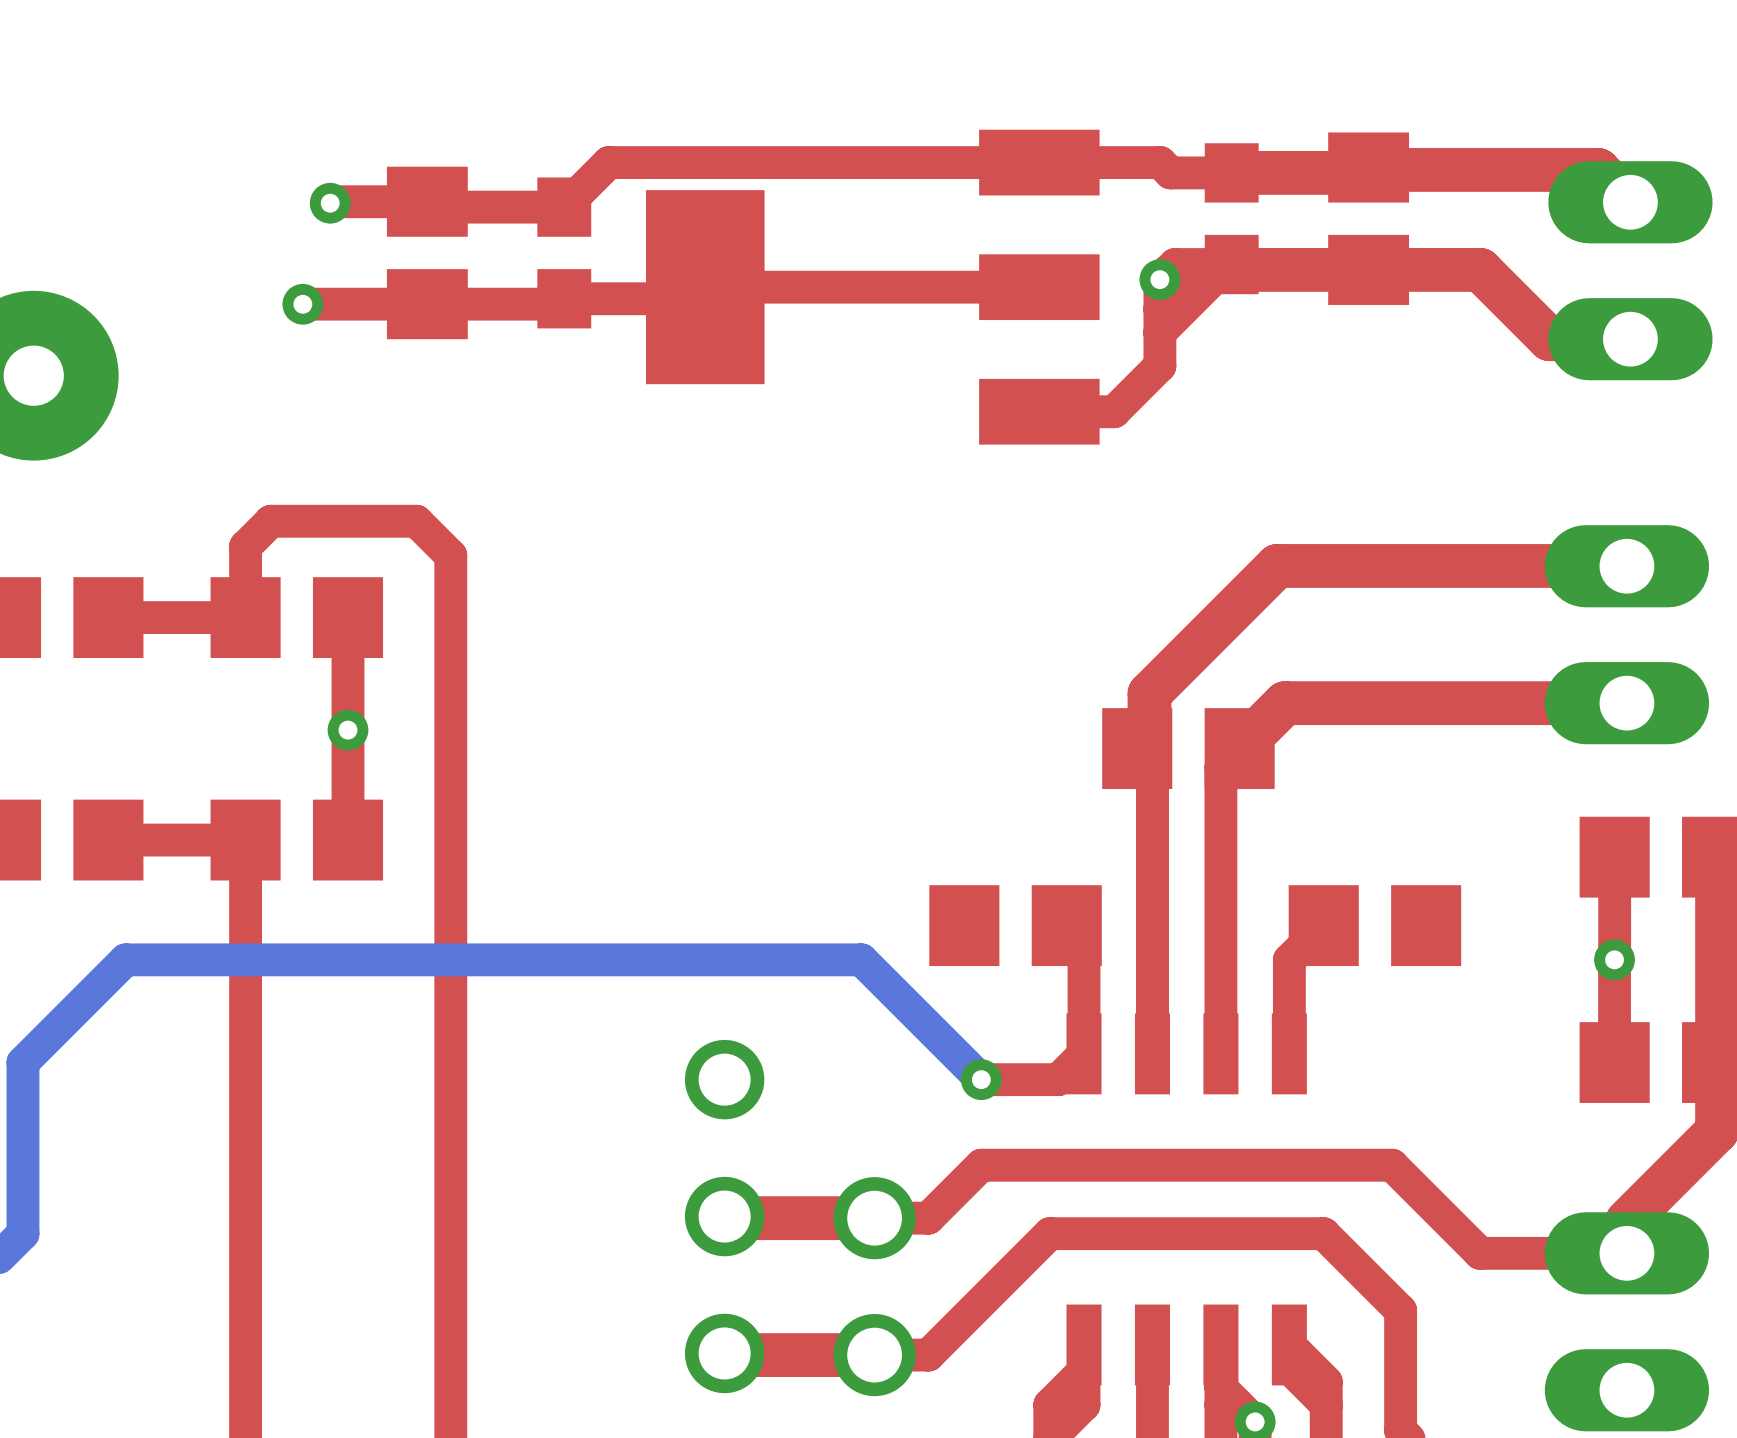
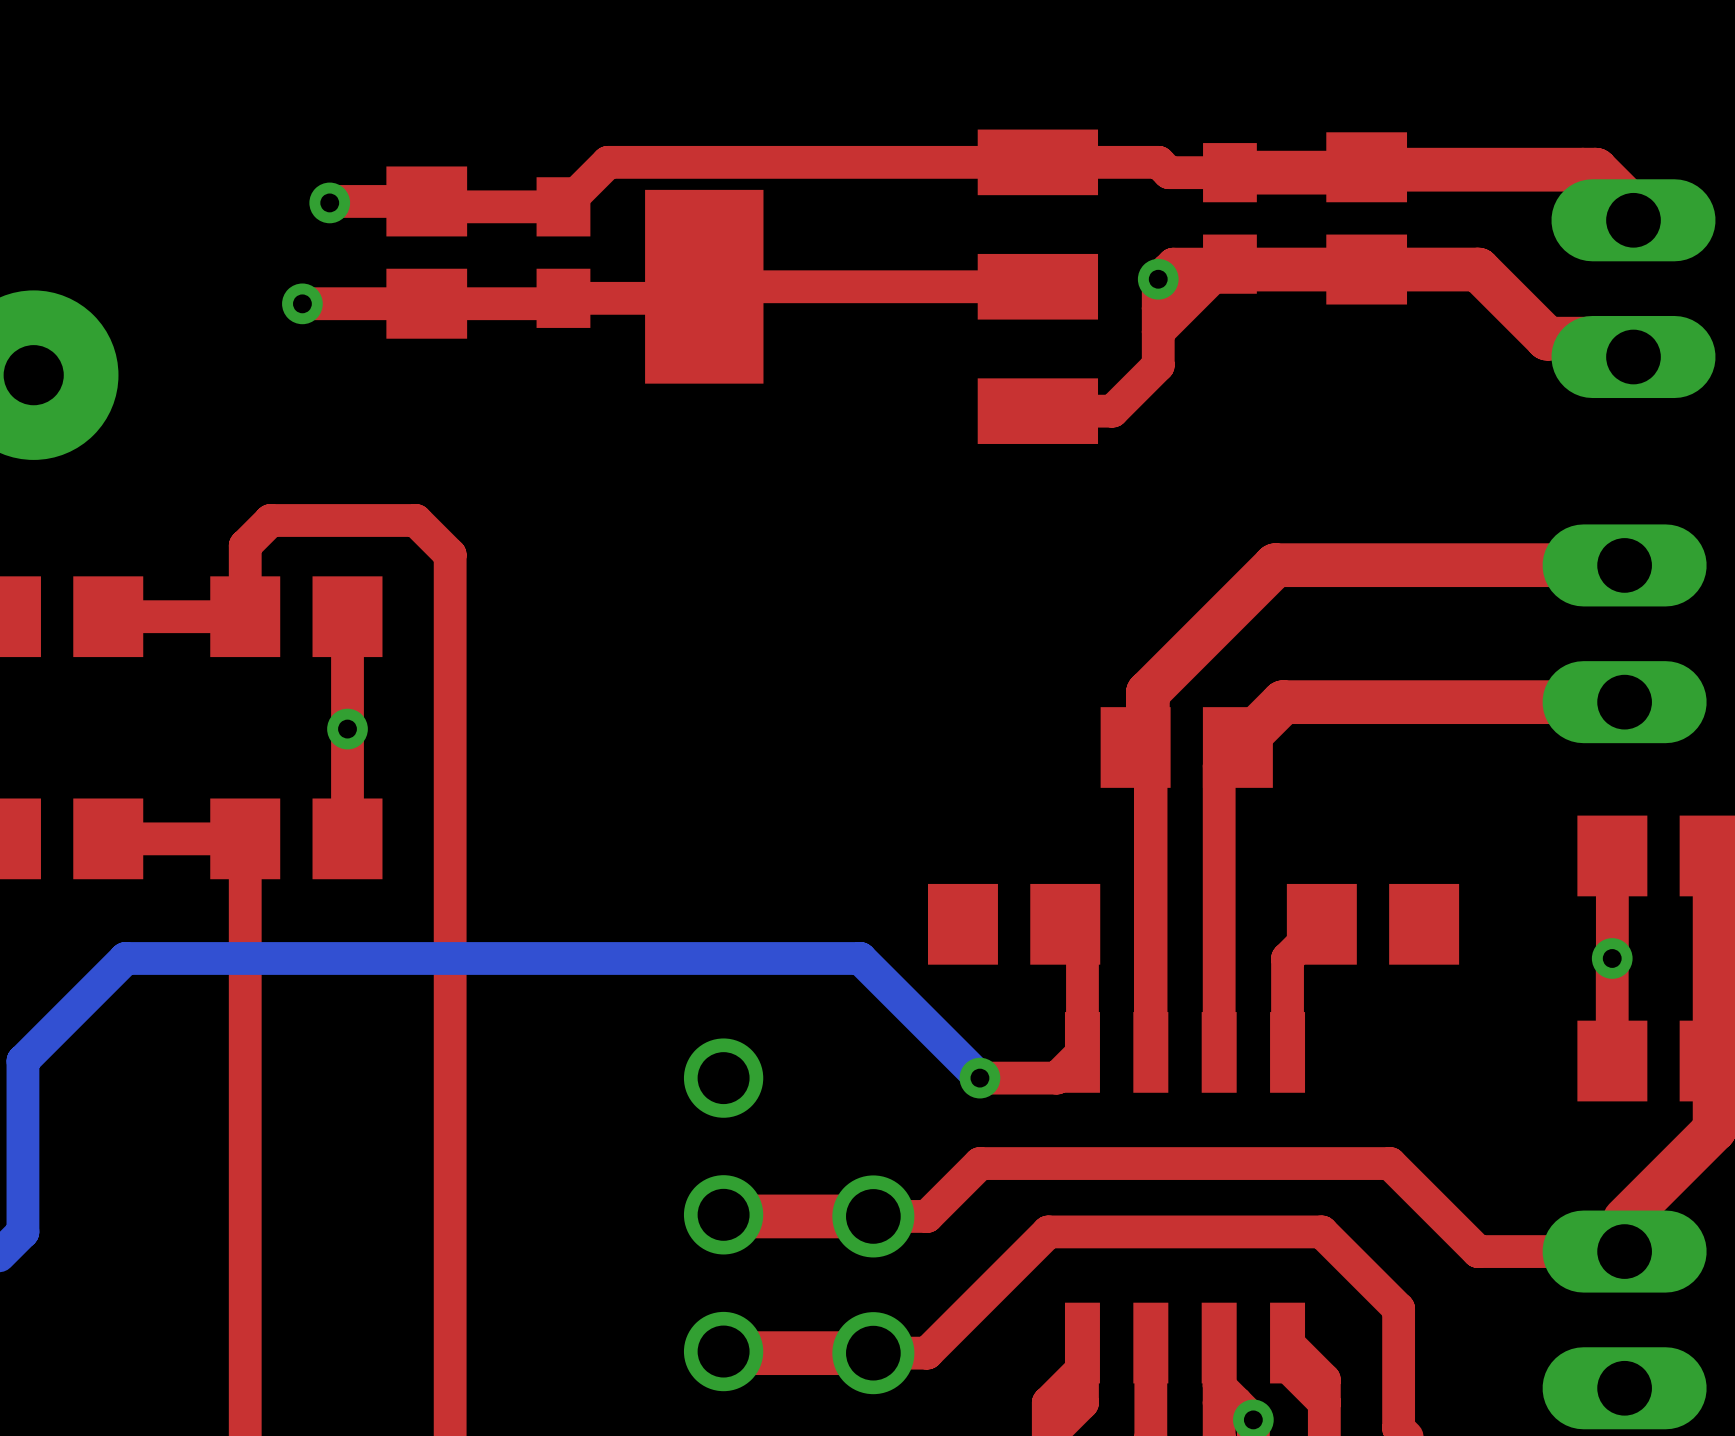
part position: (1630, 270) -> (1633, 288)

